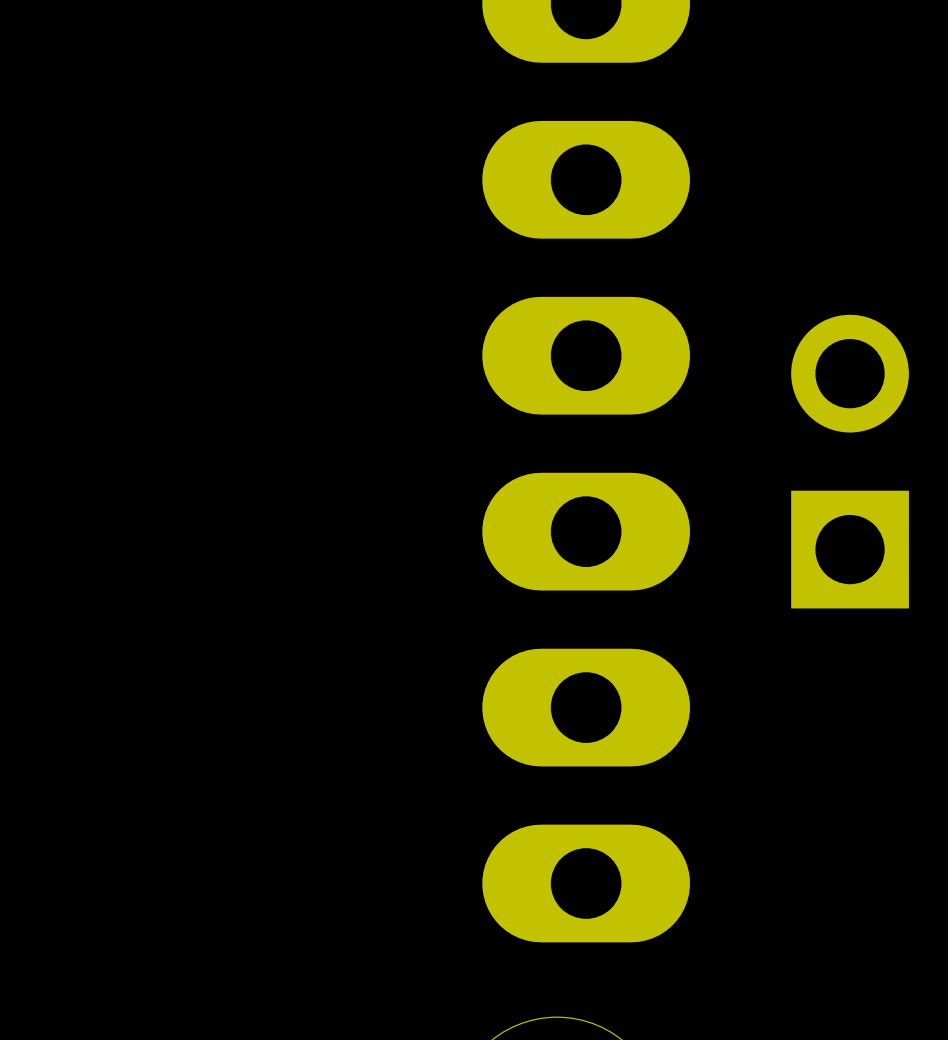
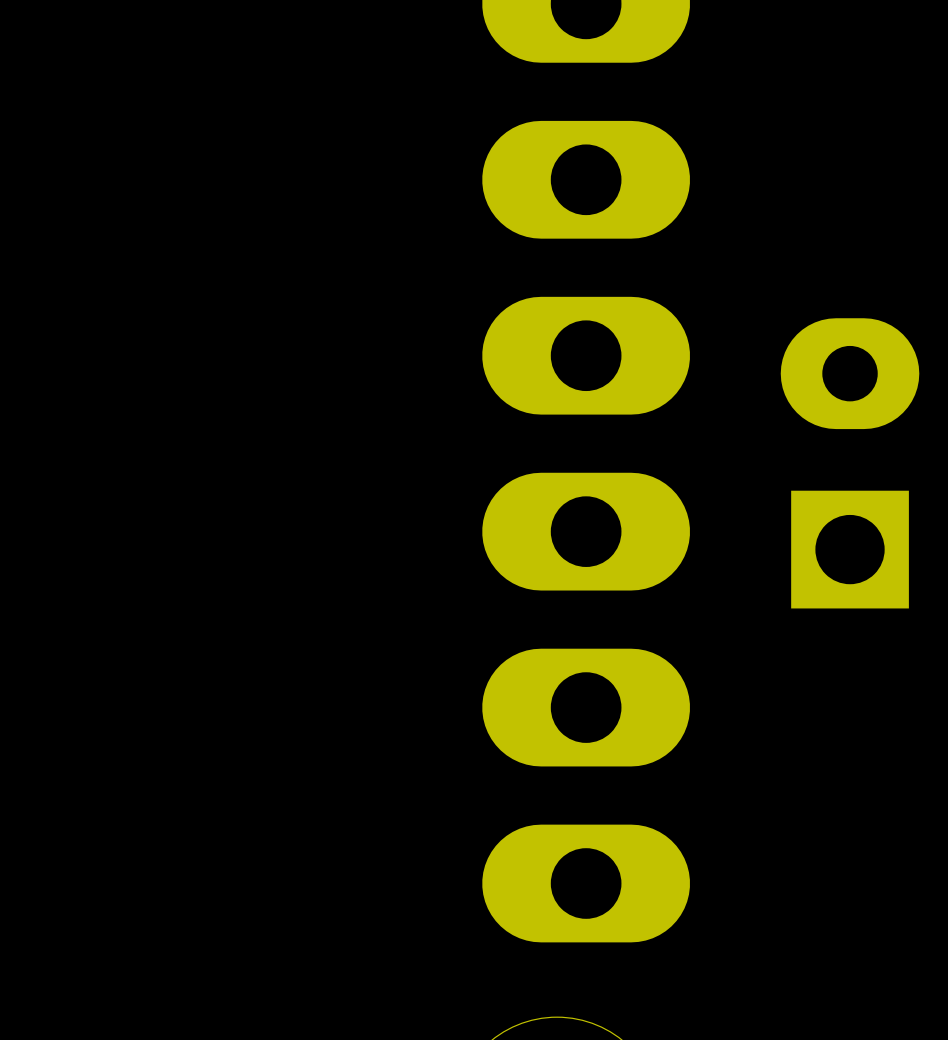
part footprint: [791, 314, 909, 609] -> [780, 318, 920, 609]

